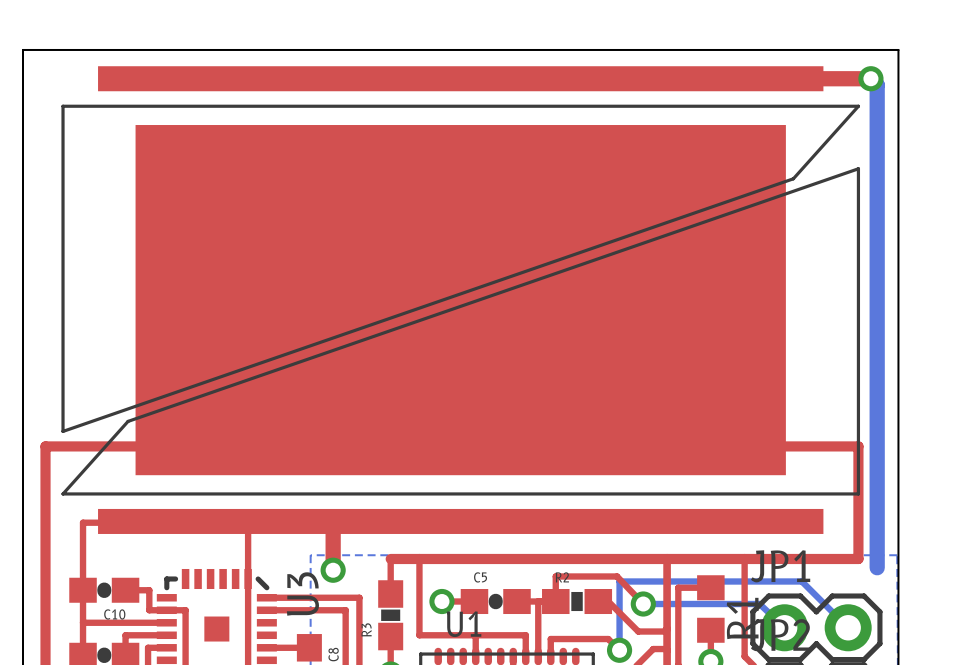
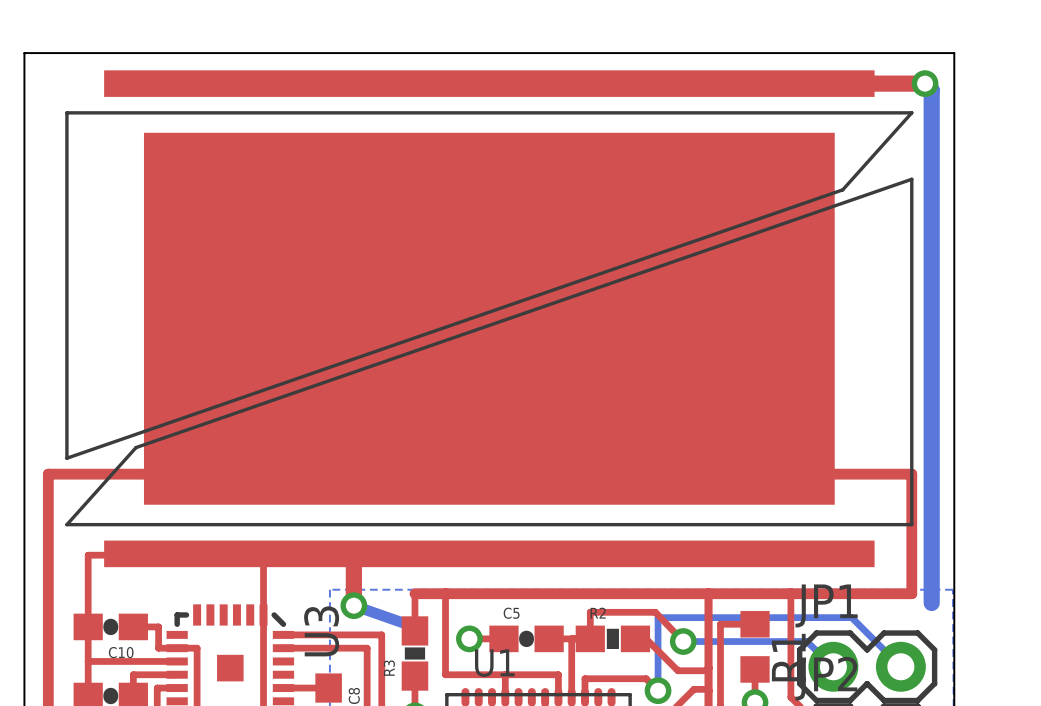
bottom track: none -> (353, 605) (406, 624)

